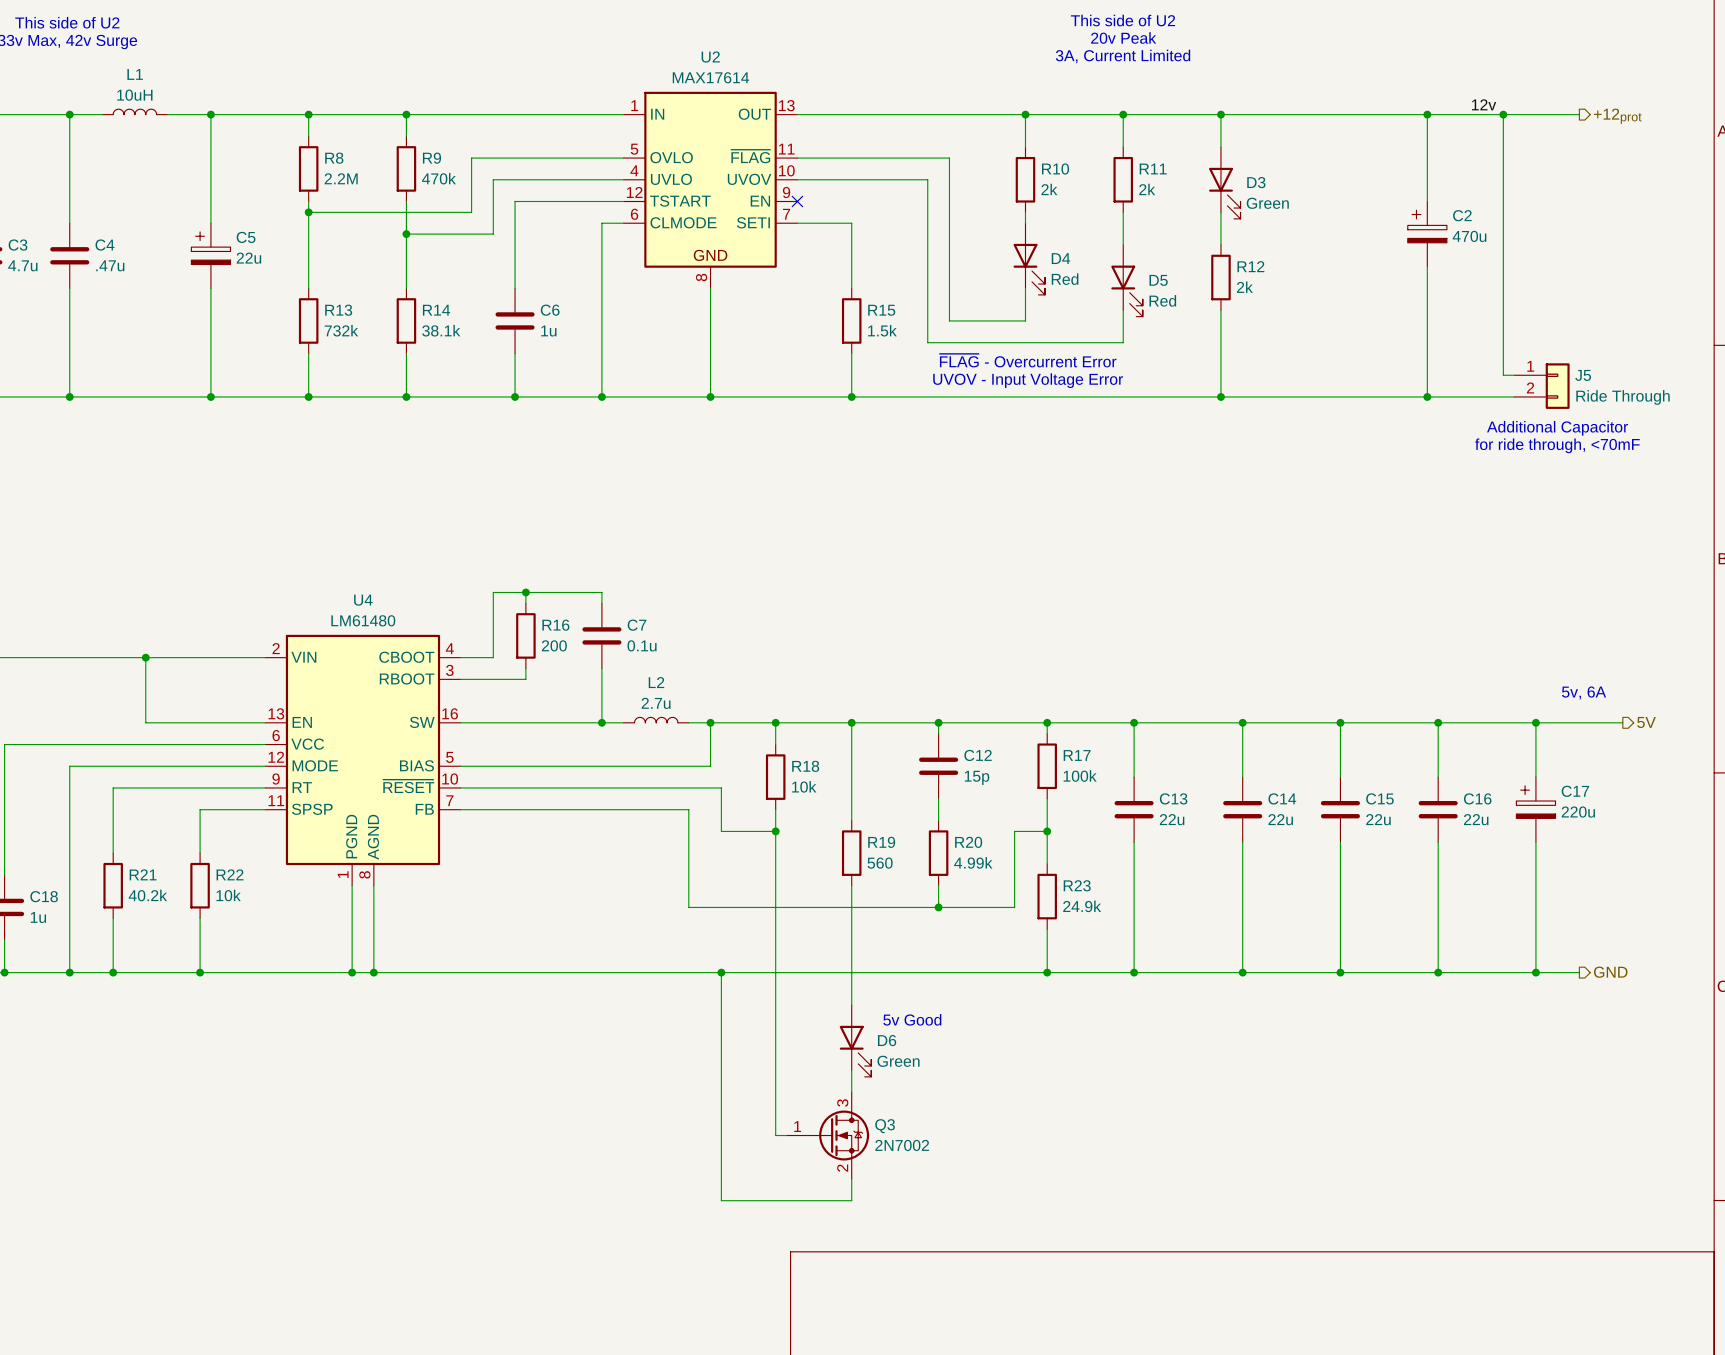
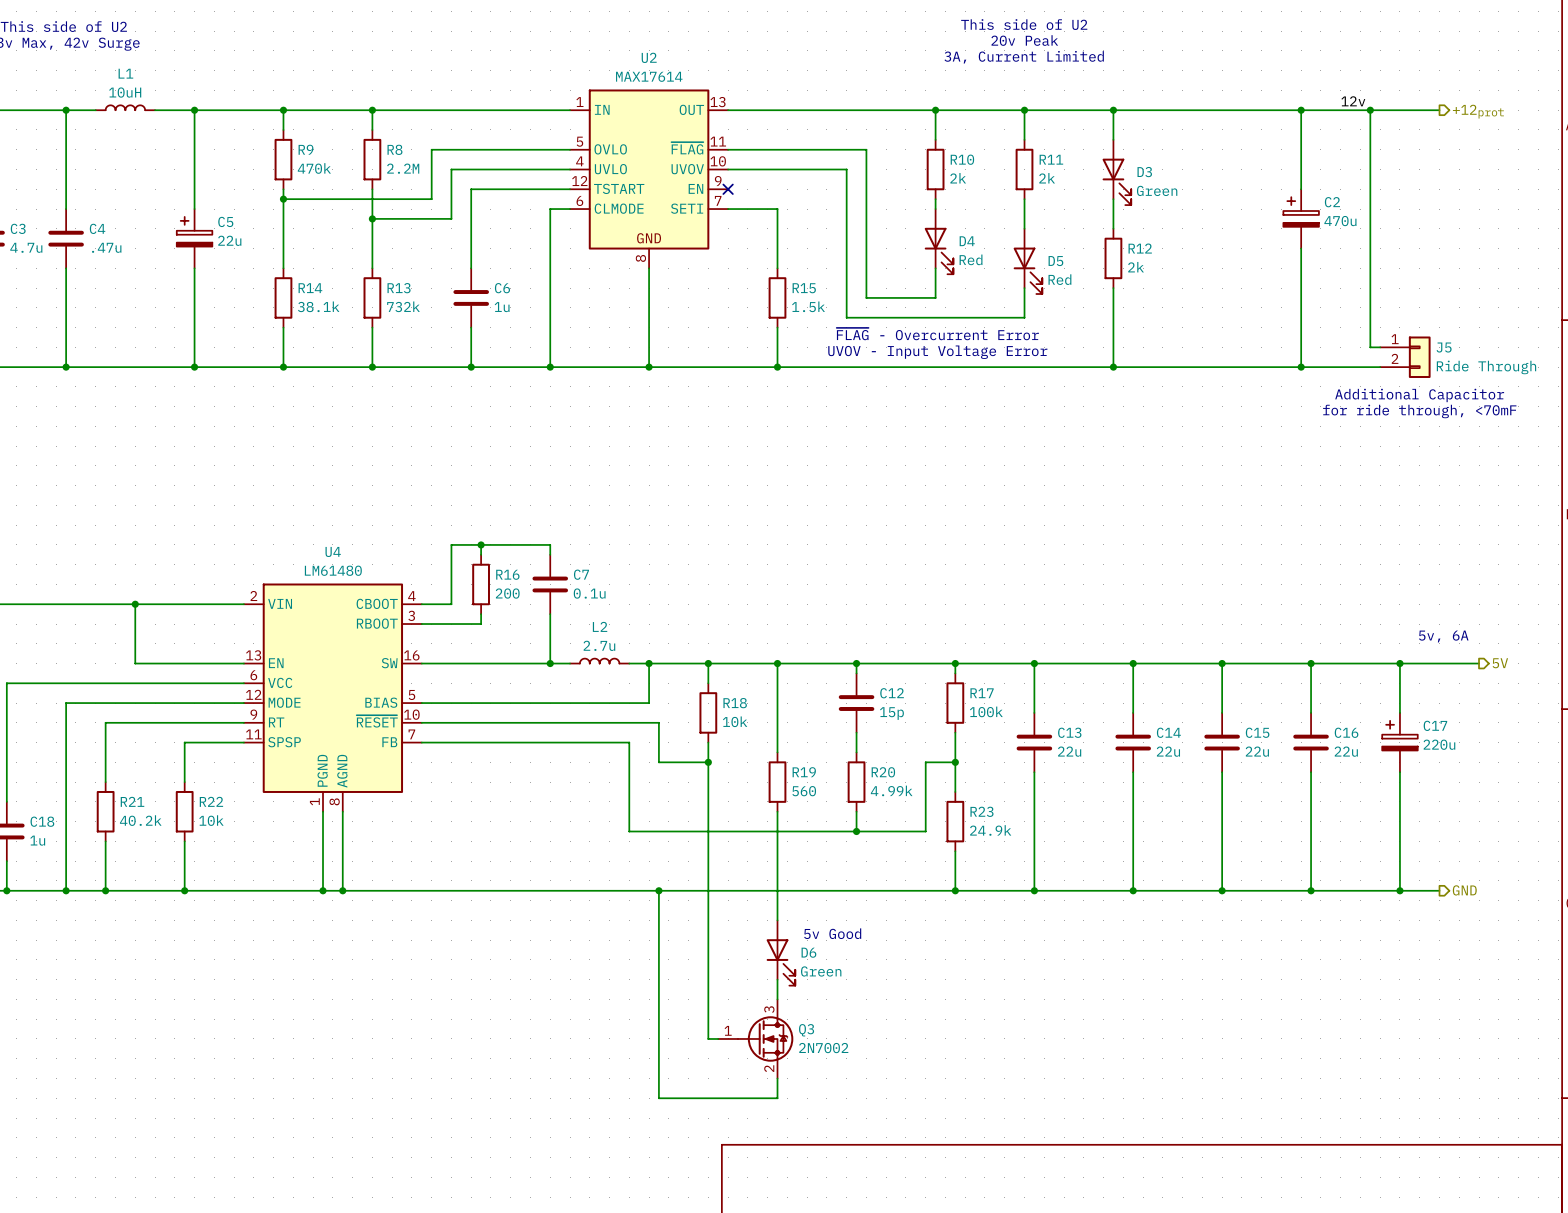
R8 name: R8 (334, 158) -> R9 (305, 149)
R9 name: R9 (431, 158) -> R8 (394, 149)
R8 value: 2.2M (341, 178) -> 470k (314, 168)
R9 value: 470k (438, 178) -> 2.2M (403, 168)
R13 name: R13 (338, 310) -> R14 (310, 288)
R14 name: R14 (436, 310) -> R13 (399, 288)
R13 value: 732k (341, 330) -> 38.1k (318, 306)
R14 value: 38.1k (441, 330) -> 732k (403, 306)

